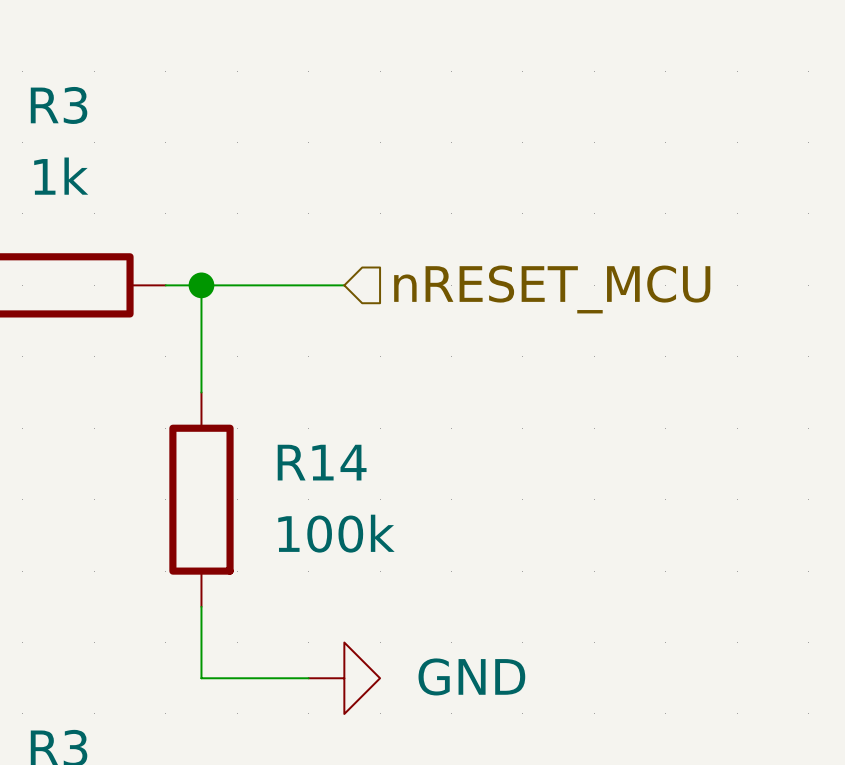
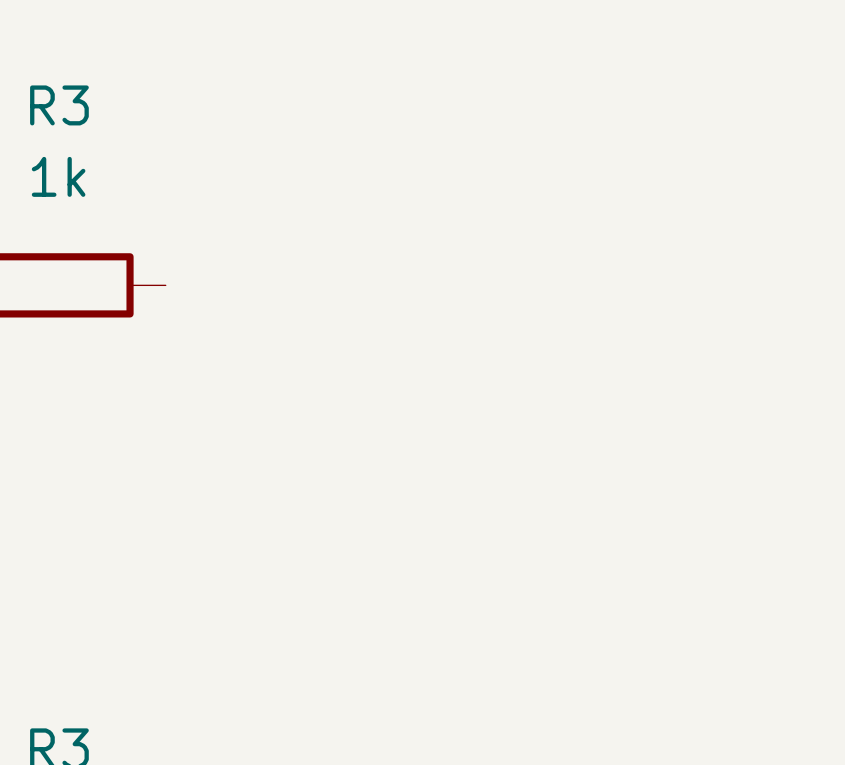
wire: (165, 285) (344, 285) -> none
wire: (201, 285) (201, 392) -> none
junction: (201, 285) -> none
hierarchical label: nRESET_MCU (552, 289) -> none
R14: 100k (201, 499) -> none
wire: (201, 606) (201, 678) (308, 678) -> none
power symbol: GND (344, 678) -> none

